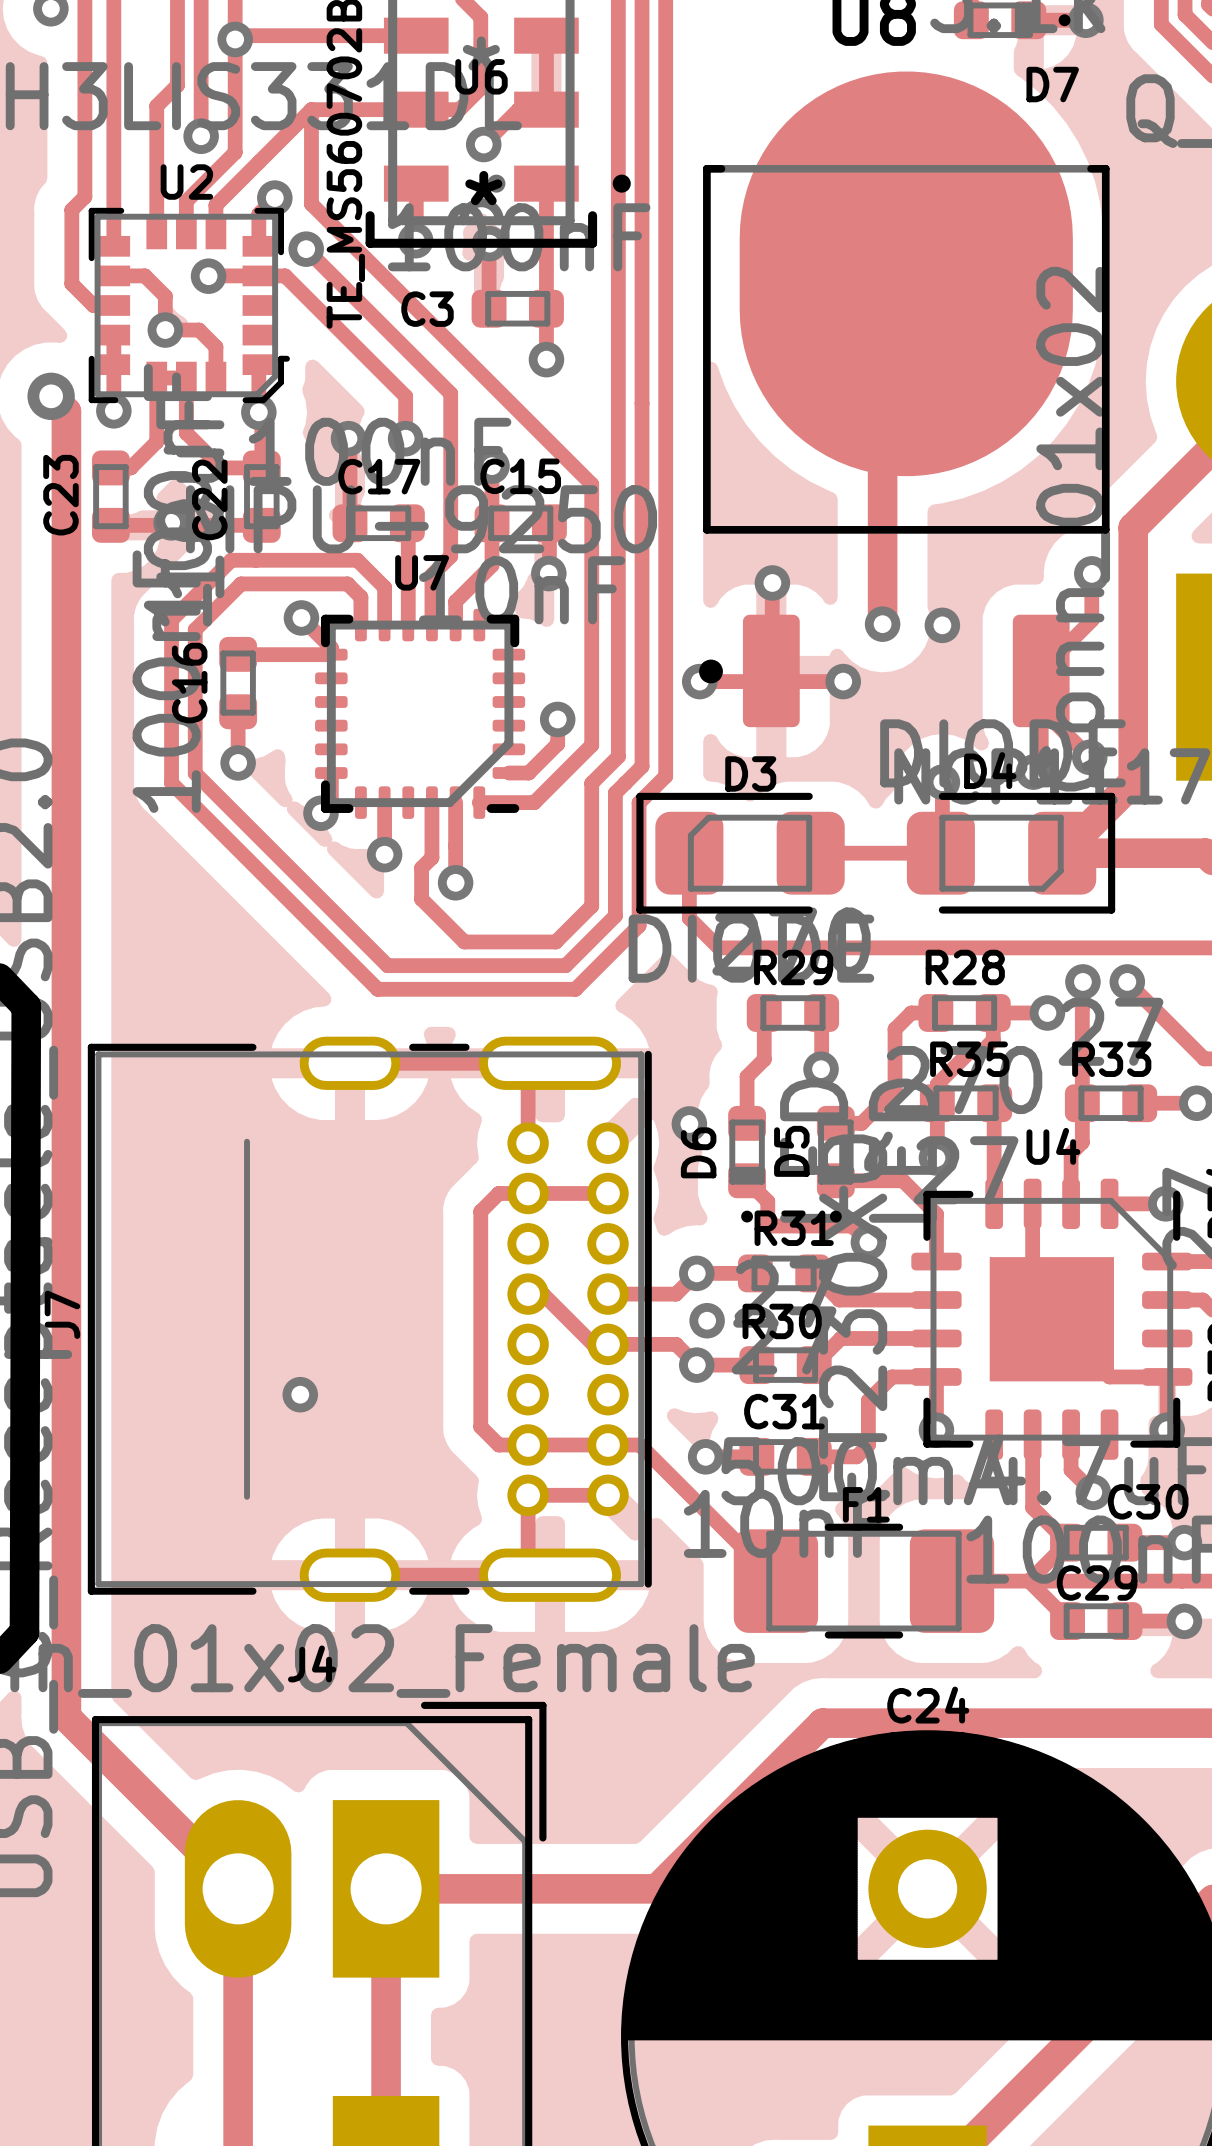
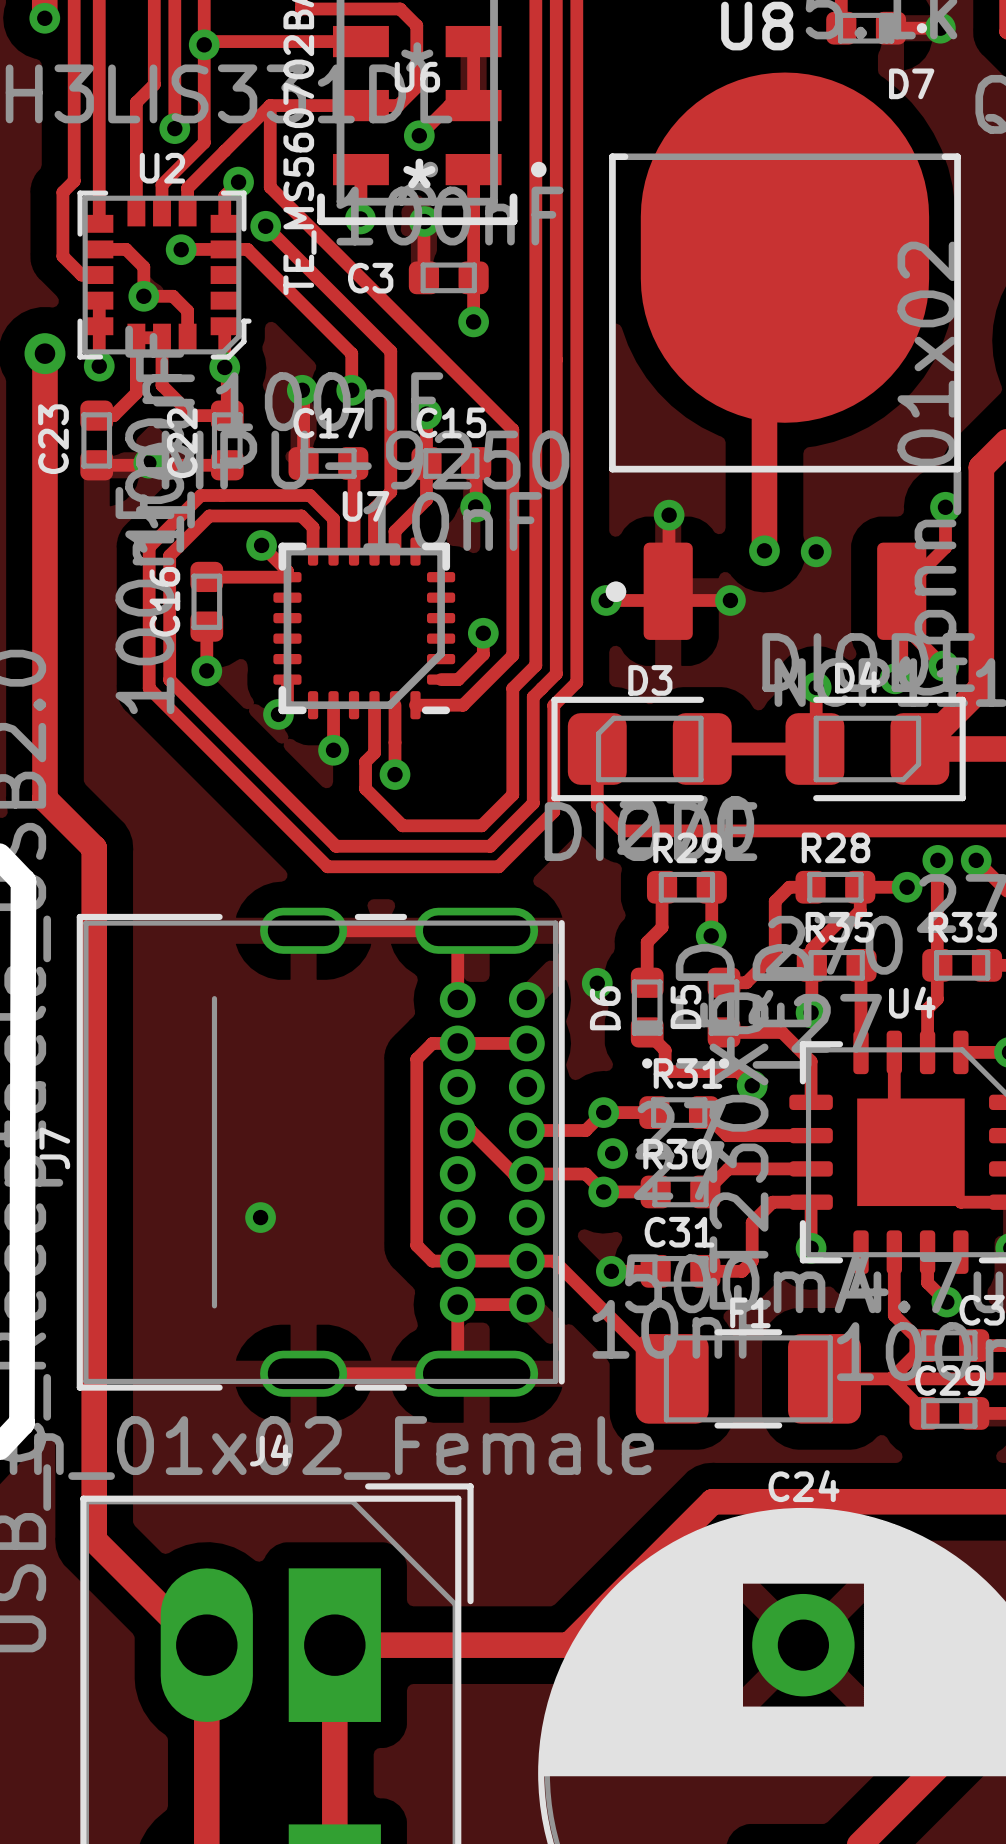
track: (51, 396) (66, 411) (66, 1717) (238, 1888) -> (44, 353) (44, 798) (94, 848) (94, 1540) (199, 1645) (206, 1645)

